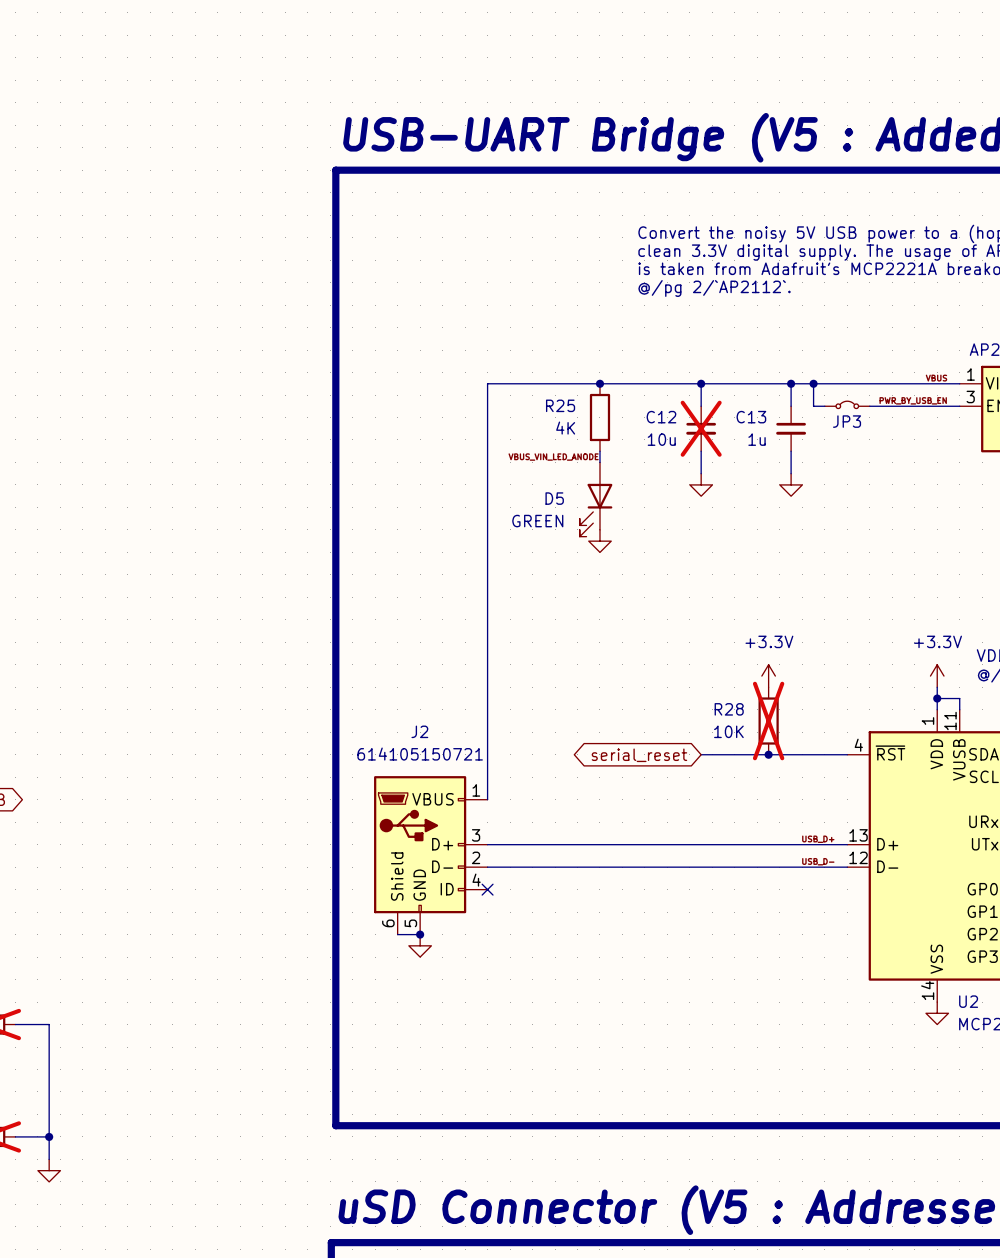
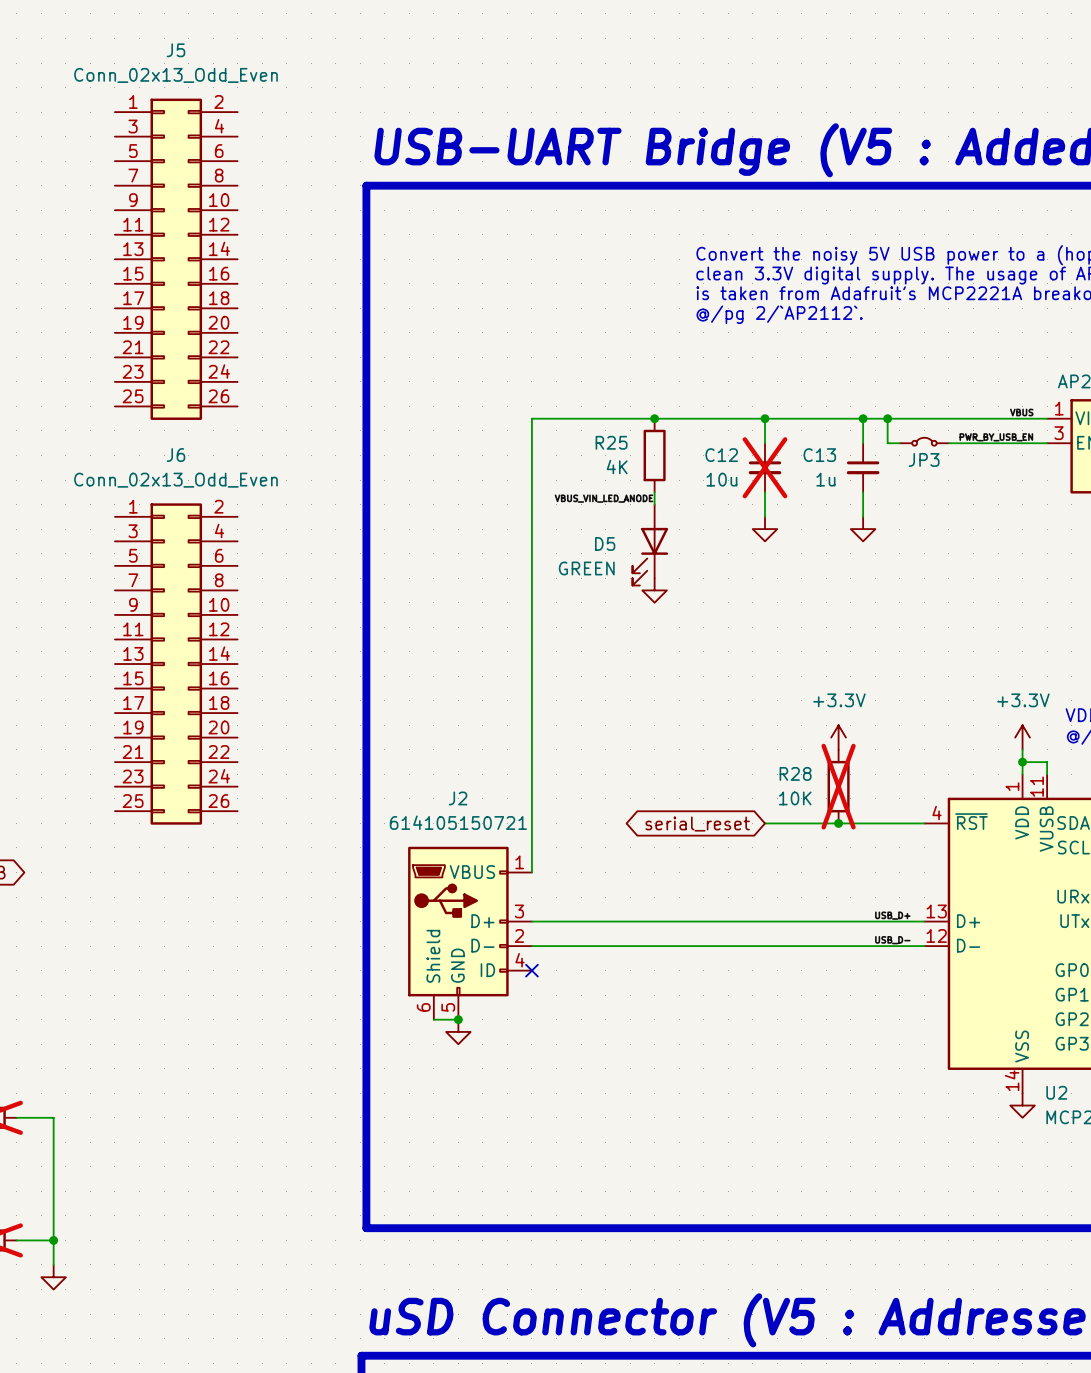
J5: none -> Conn_02x13_Odd_Even (176, 259)
J6: none -> Conn_02x13_Odd_Even (176, 664)

